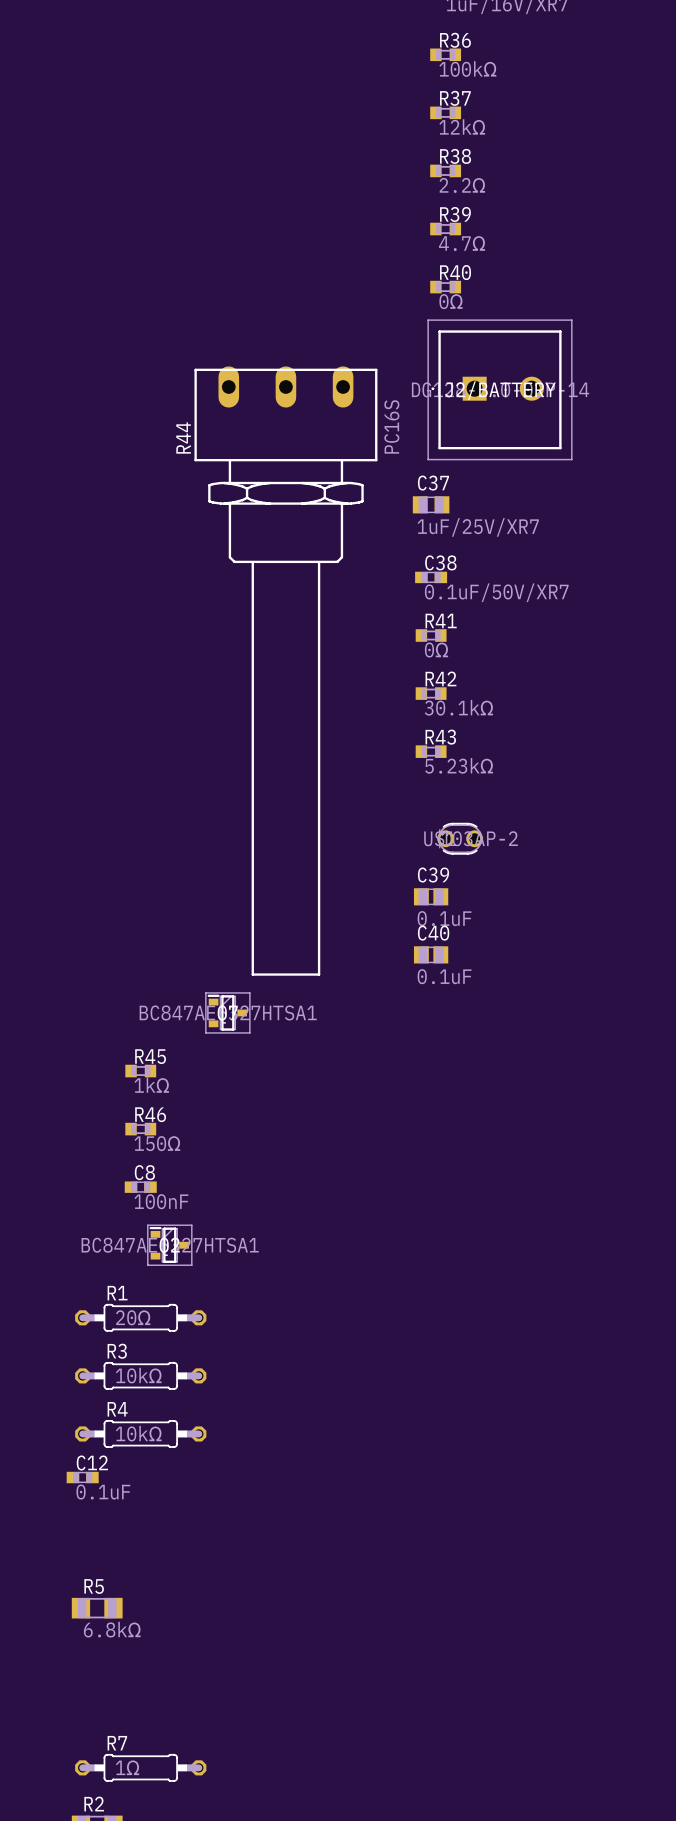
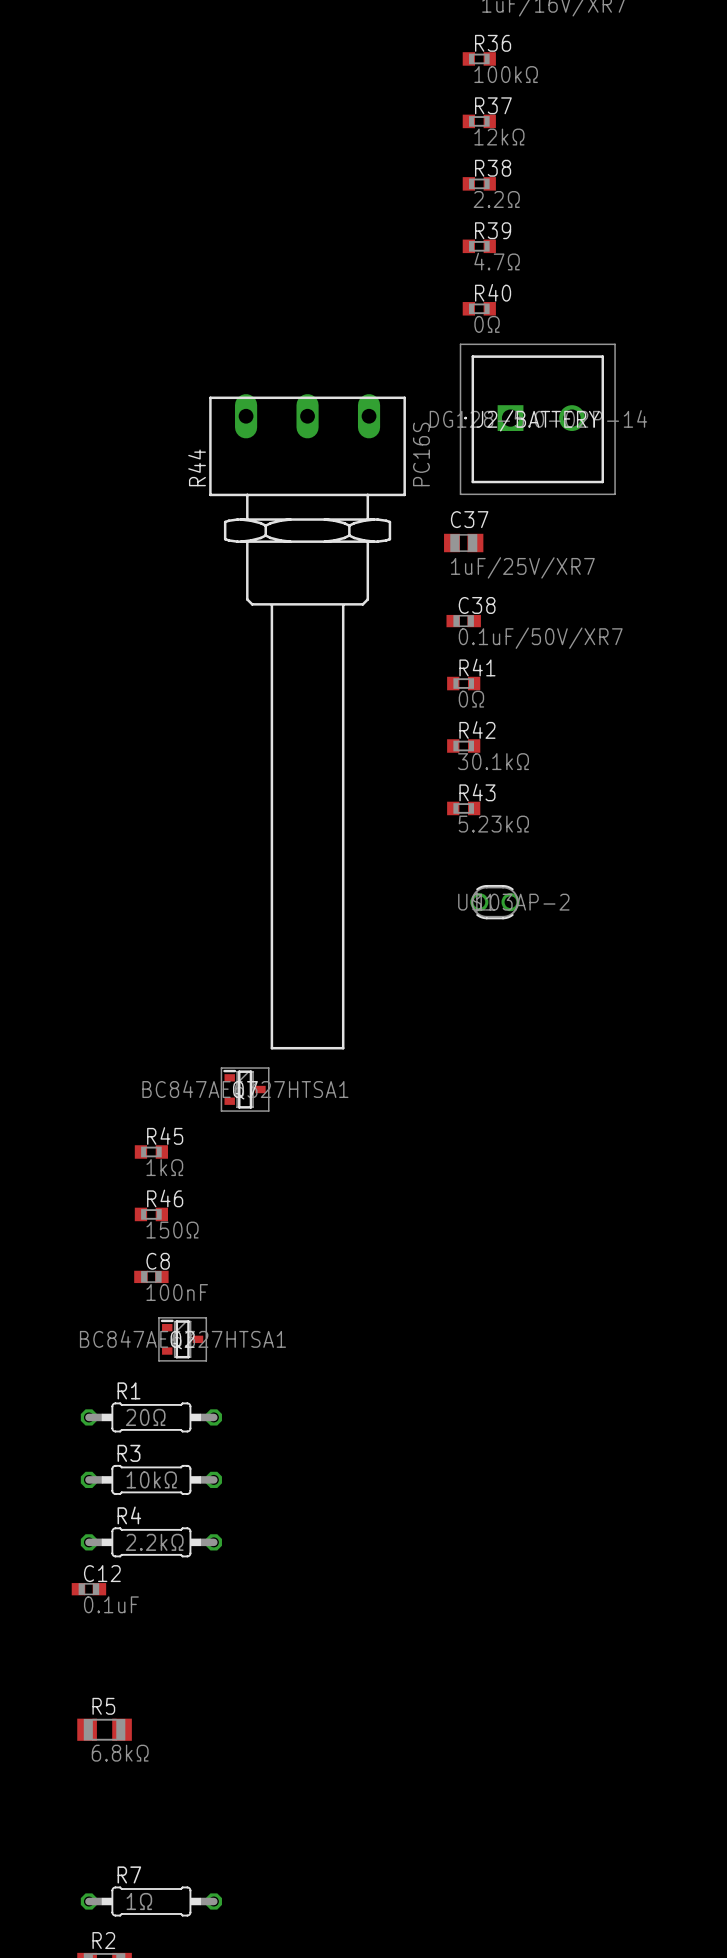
C39: 0.1uF (431, 896) -> none
C40: 0.1uF (431, 954) -> none
R4 value: 10kΩ (138, 1433) -> 2.2kΩ (154, 1542)

